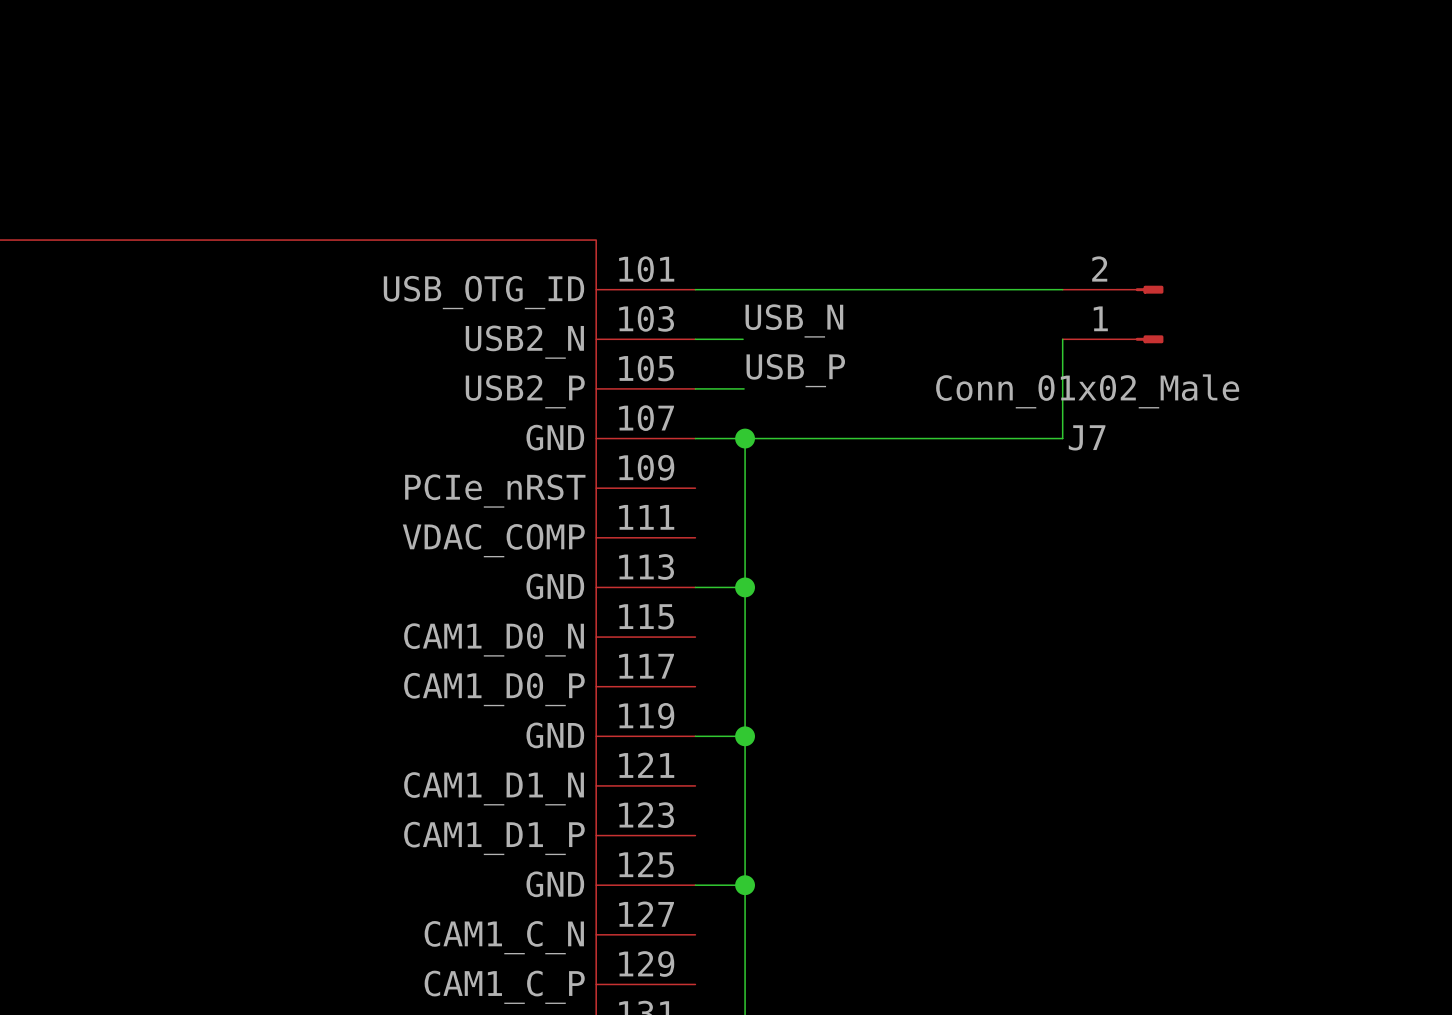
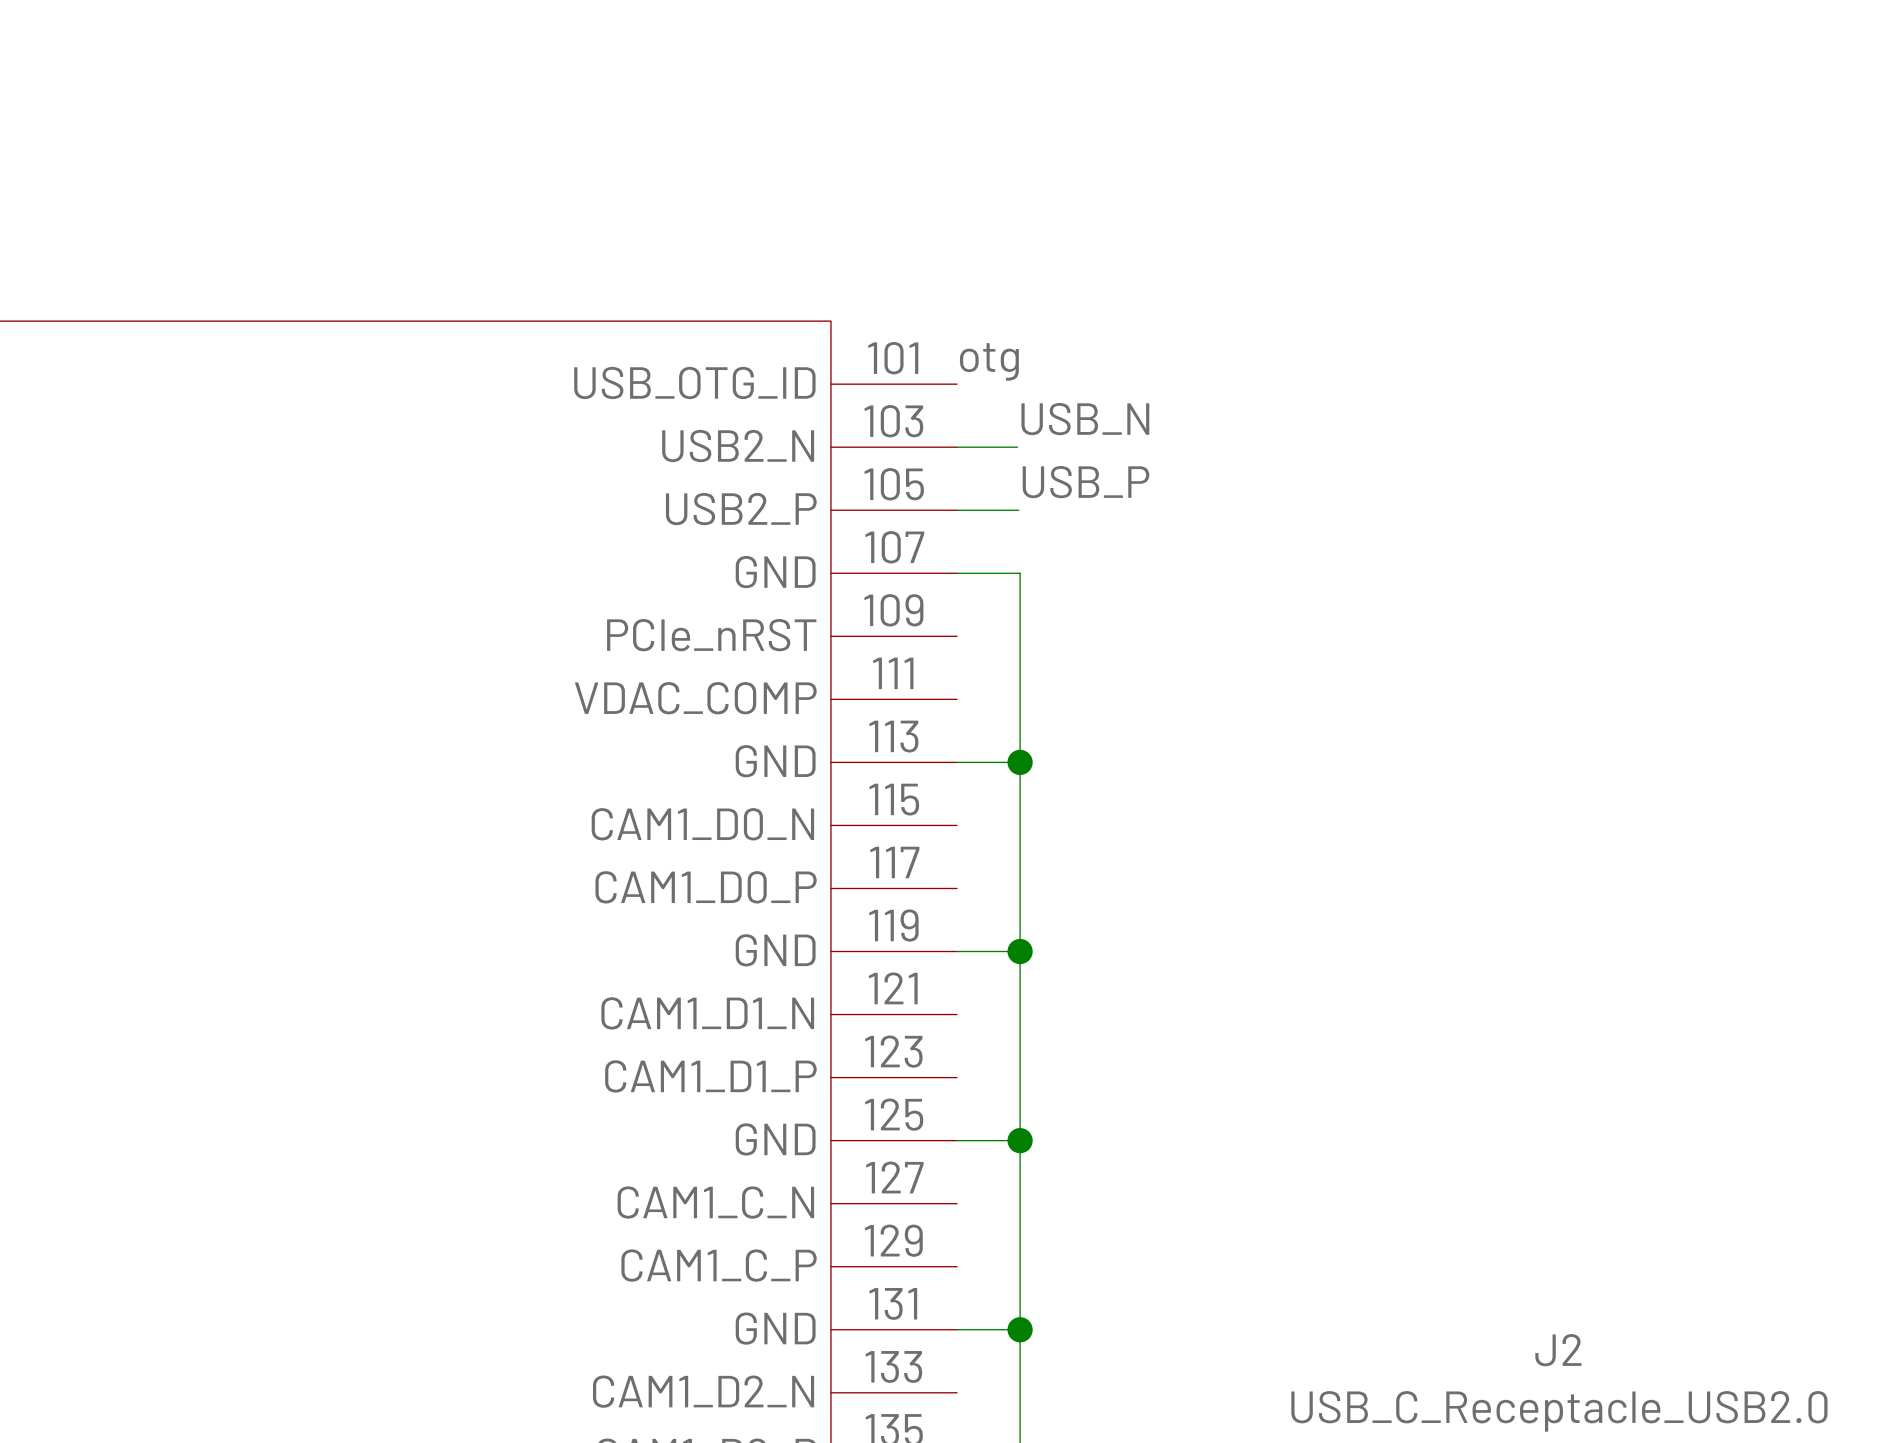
label: none -> otg (989, 361)
wire: (695, 289) (1062, 289) -> none
J7: Conn_01x02_Male (1113, 314) -> none
wire: (1062, 339) (1062, 438) (745, 438) -> none
junction: (745, 438) -> none

